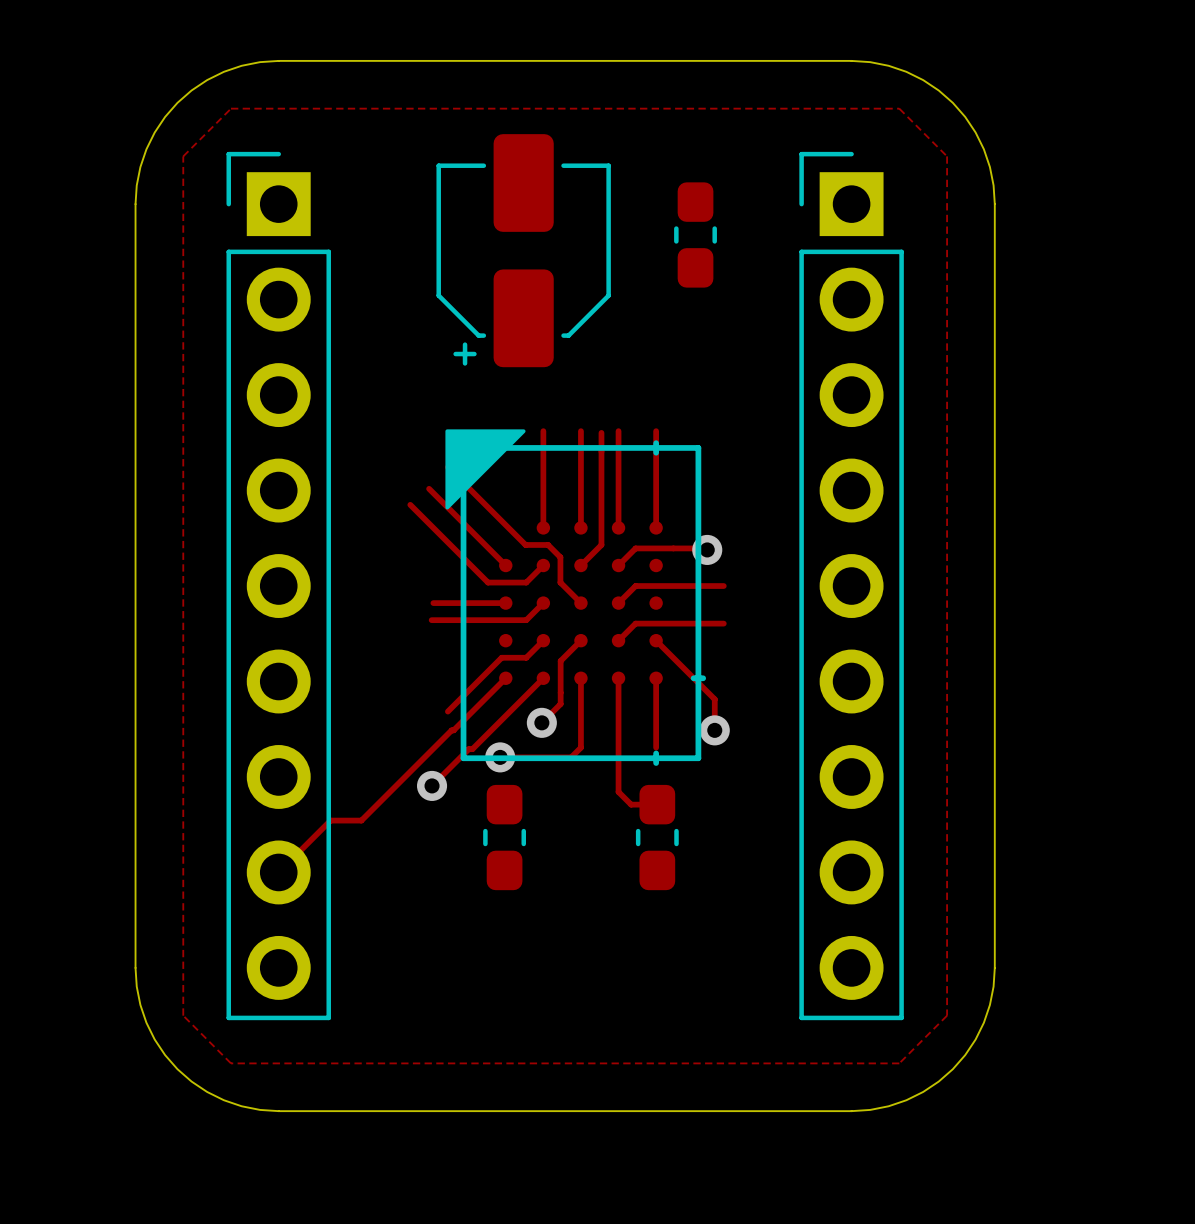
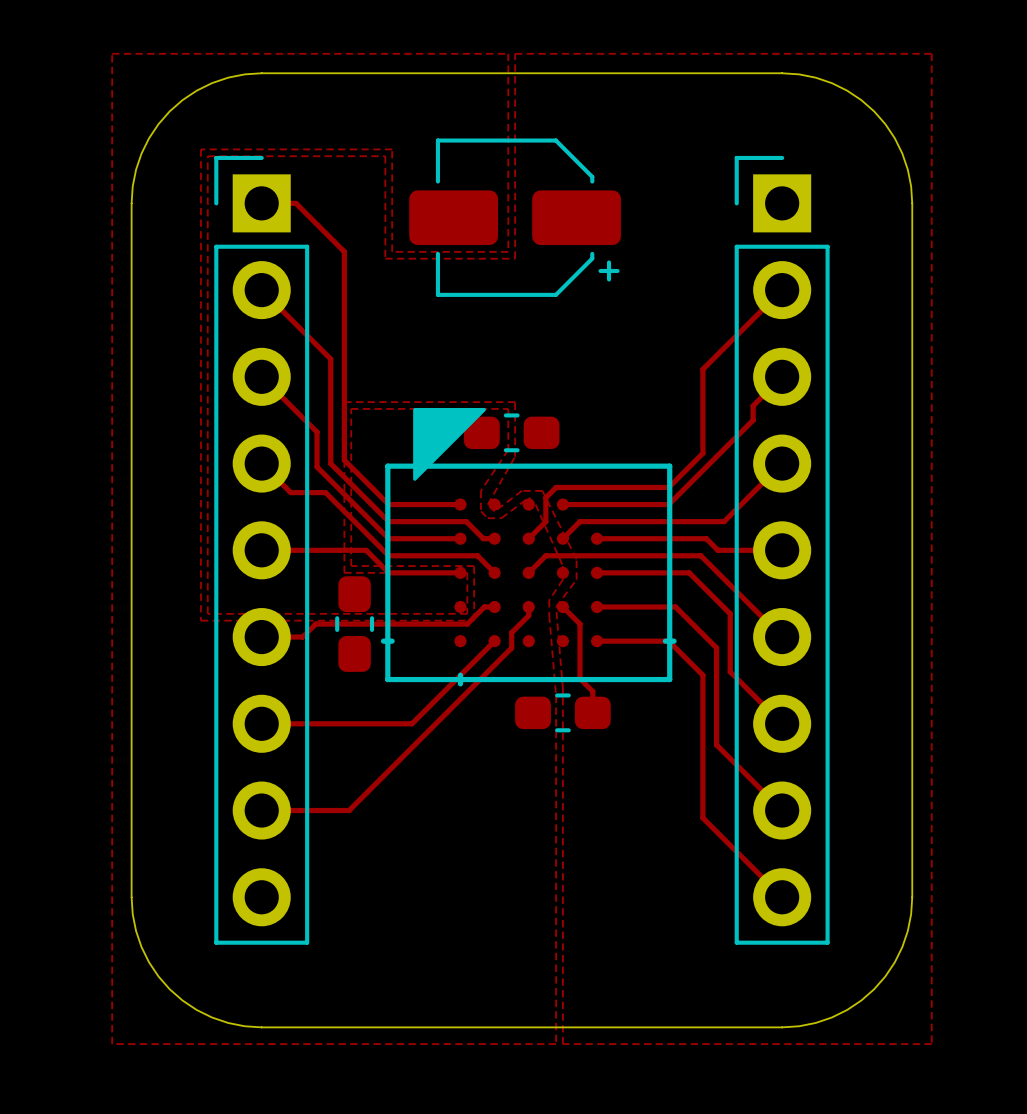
zone outline: none -> (112, 53) (508, 53) (508, 251) (392, 251) (392, 149) (200, 149) (200, 620) (474, 620) (474, 566) (351, 566) (351, 408) (508, 408) (508, 449) (480, 490) (480, 511) (487, 518) (501, 518) (528, 497) (535, 504) (562, 566) (562, 579) (549, 600) (556, 695) (556, 1044) (112, 1044) (112, 53)
zone outline: (231, 108) (183, 156) (183, 1015) (231, 1063) (899, 1063) (947, 1015) (947, 156) (899, 108) (231, 108) -> (515, 53) (515, 258) (385, 258) (385, 156) (207, 156) (207, 613) (467, 613) (467, 572) (344, 572) (344, 402) (515, 402) (515, 456) (487, 504) (494, 511) (521, 490) (542, 490) (576, 559) (576, 579) (556, 607) (562, 688) (562, 1044) (931, 1044) (931, 53) (515, 53)
track: none -> (261, 203) (295, 203) (344, 251) (344, 460) (388, 504) (460, 504)
part: (695, 234) -> none
part rotation: 0° (523, 250) -> 90° counterclockwise (515, 217)
track: none -> (261, 290) (330, 359) (330, 463) (388, 521) (466, 521) (483, 538) (494, 538)
track: none -> (782, 290) (702, 369) (702, 453) (668, 487) (556, 487) (545, 497) (545, 521) (528, 538)
track: none -> (261, 376) (317, 432) (317, 466) (388, 538) (460, 538)
track: none -> (782, 376) (753, 405) (753, 420) (668, 504) (562, 504)
track: (543, 431) (543, 527) -> none
track: (580, 431) (580, 527) -> none
track: (618, 431) (618, 527) -> none
track: (656, 431) (656, 527) -> none
track: (601, 432) (601, 544) (580, 565) -> none
part: none -> (511, 432)
track: (447, 467) (525, 544) (548, 544) (560, 557) (560, 582) (580, 603) -> none
track: (429, 488) (505, 565) -> none
track: none -> (261, 463) (290, 492) (325, 492) (388, 555) (477, 555) (494, 572)
track: none -> (782, 463) (724, 521) (579, 521) (562, 538)
track: (410, 504) (488, 582) (526, 582) (543, 565) -> none
track: (707, 549) (635, 548) (618, 565) -> none
via: (707, 549) -> none
track: none -> (597, 538) (706, 538) (717, 550) (782, 550)
track: none -> (261, 550) (366, 550) (388, 572) (460, 572)
track: (723, 586) (635, 586) (618, 603) -> none
track: (433, 603) (505, 603) -> none
track: (543, 603) (526, 620) (431, 620) -> none
part rotation: 0° (583, 603) -> 90° clockwise (528, 575)
track: none -> (528, 572) (545, 555) (700, 555) (782, 637)
track: none -> (597, 572) (689, 572) (730, 613) (730, 671) (782, 723)
track: (723, 623) (635, 623) (618, 640) -> none
track: (543, 640) (526, 657) (501, 657) (447, 711) -> none
track: (580, 640) (560, 660) (560, 704) (541, 722) -> none
track: (656, 640) (714, 699) (714, 730) -> none
track: none -> (494, 607) (484, 607) (467, 624) (315, 624) (302, 637) (261, 637)
track: none -> (562, 607) (579, 624) (579, 678) (592, 691) (592, 712)
track: none -> (597, 607) (675, 607) (716, 647) (716, 744) (782, 810)
part: none -> (354, 624)
track: (505, 678) (361, 820) (330, 820) (278, 872) -> (528, 607) (528, 615) (511, 632) (511, 647) (349, 810) (261, 810)
track: (543, 678) (472, 749) (468, 749) (432, 785) -> none
track: (580, 678) (580, 747) (571, 757) (500, 757) -> none
track: (618, 678) (618, 792) (631, 804) (657, 804) -> none
track: (656, 678) (656, 747) -> none
track: none -> (494, 641) (411, 723) (261, 723)
track: none -> (597, 641) (668, 641) (702, 675) (702, 818) (782, 897)
via: (541, 722) -> none
via: (714, 730) -> none
via: (500, 757) -> none
part: none -> (562, 712)
via: (432, 785) -> none
part: (504, 837) -> none
part: (657, 837) -> none

